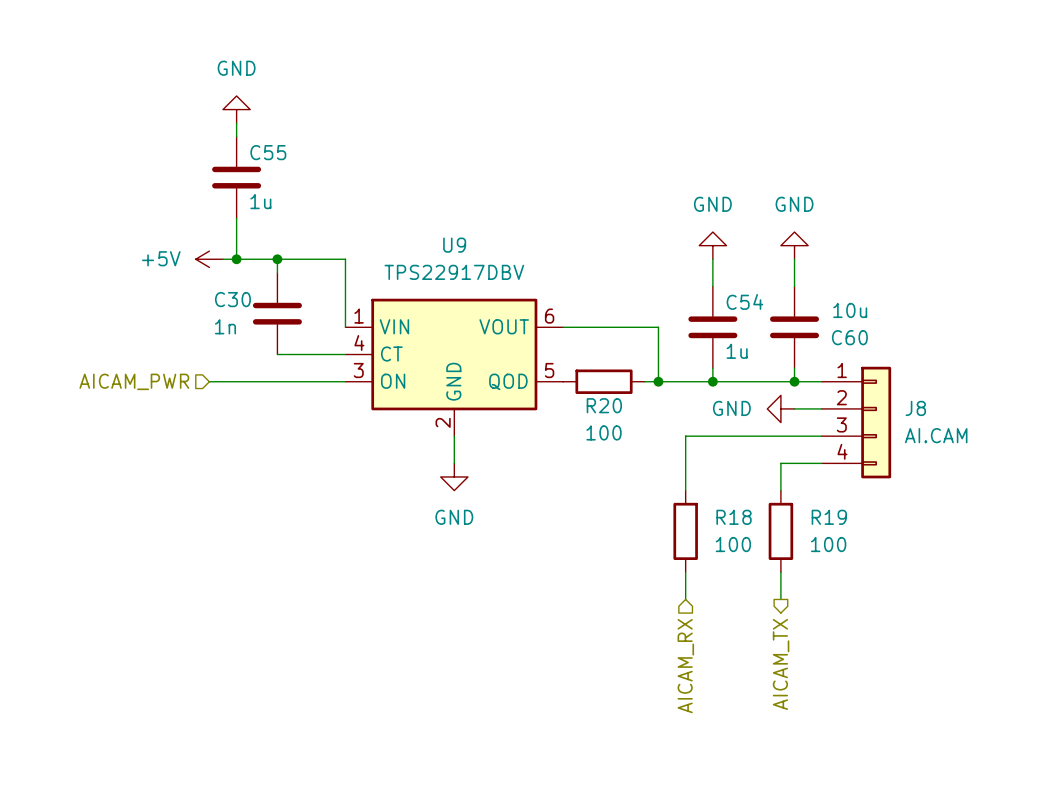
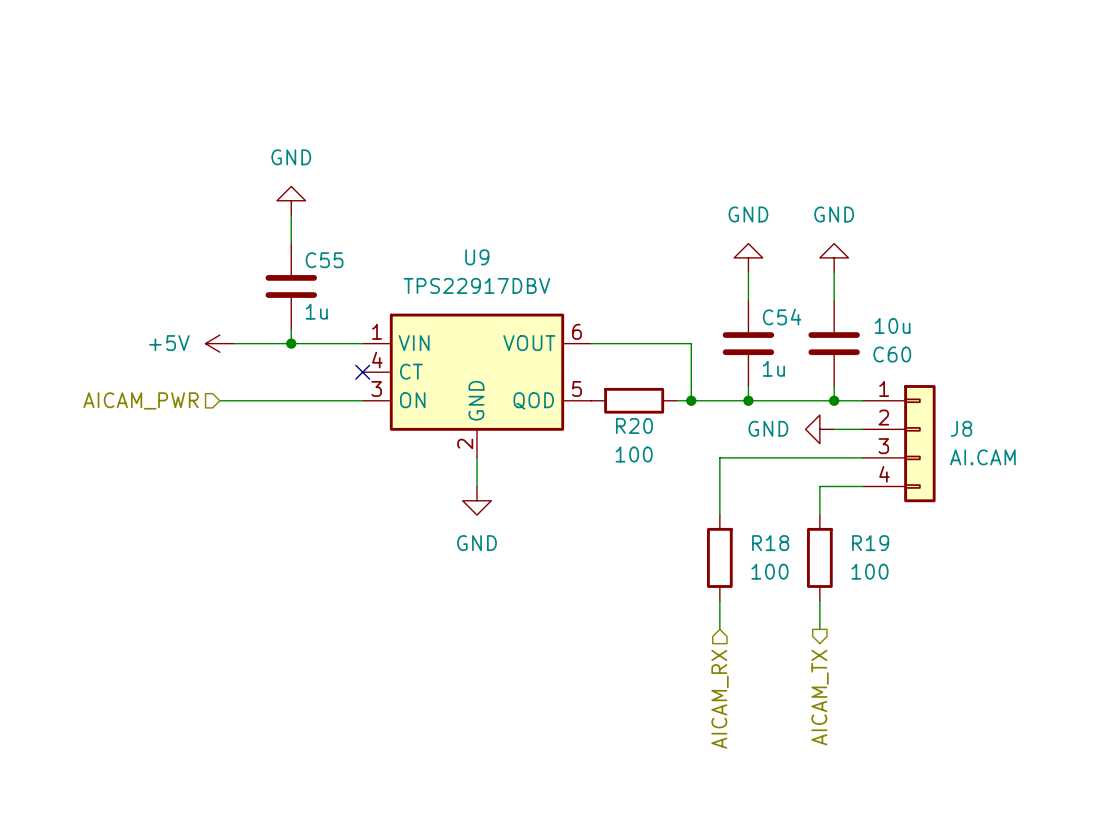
power symbol position: GND (236, 109) -> GND (291, 200)
wire: (236, 123) (236, 136) -> none
C55 position: (236, 177) -> (291, 286)
wire: none -> (291, 215) (291, 243)
wire: (236, 218) (236, 259) -> none
power symbol position: +5V (209, 259) -> +5V (219, 343)
wire: (223, 259) (345, 259) (345, 327) -> (234, 343) (362, 343)
junction: (236, 259) -> none
junction: (277, 259) -> none
C30: 1n (277, 313) -> none
junction: none -> (291, 343)
wire: (277, 354) (345, 354) -> none
no-connect mark: none -> (362, 372)

